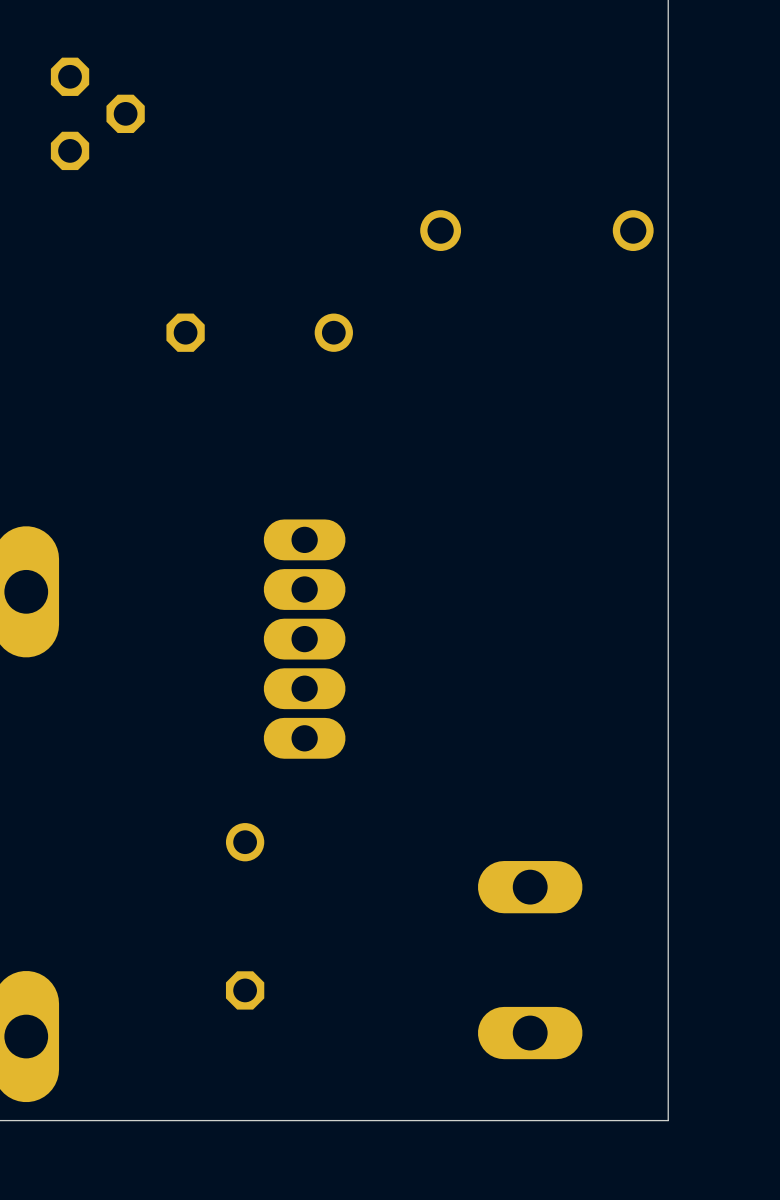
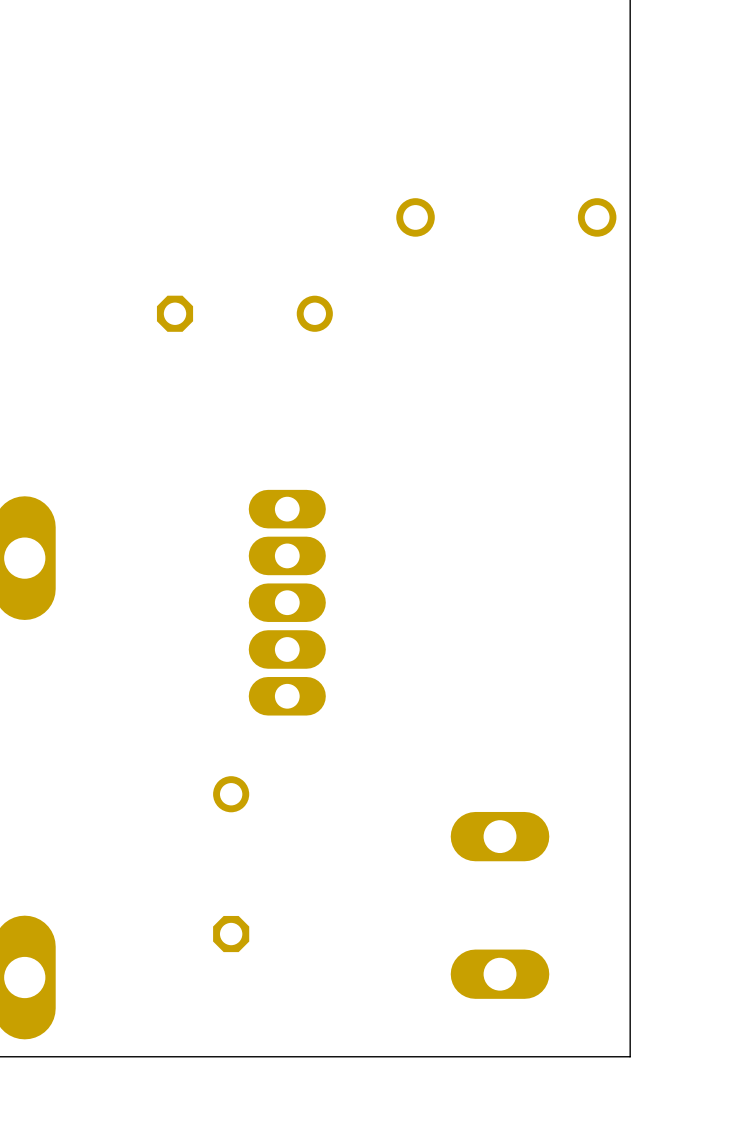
part: (97, 113) -> none

